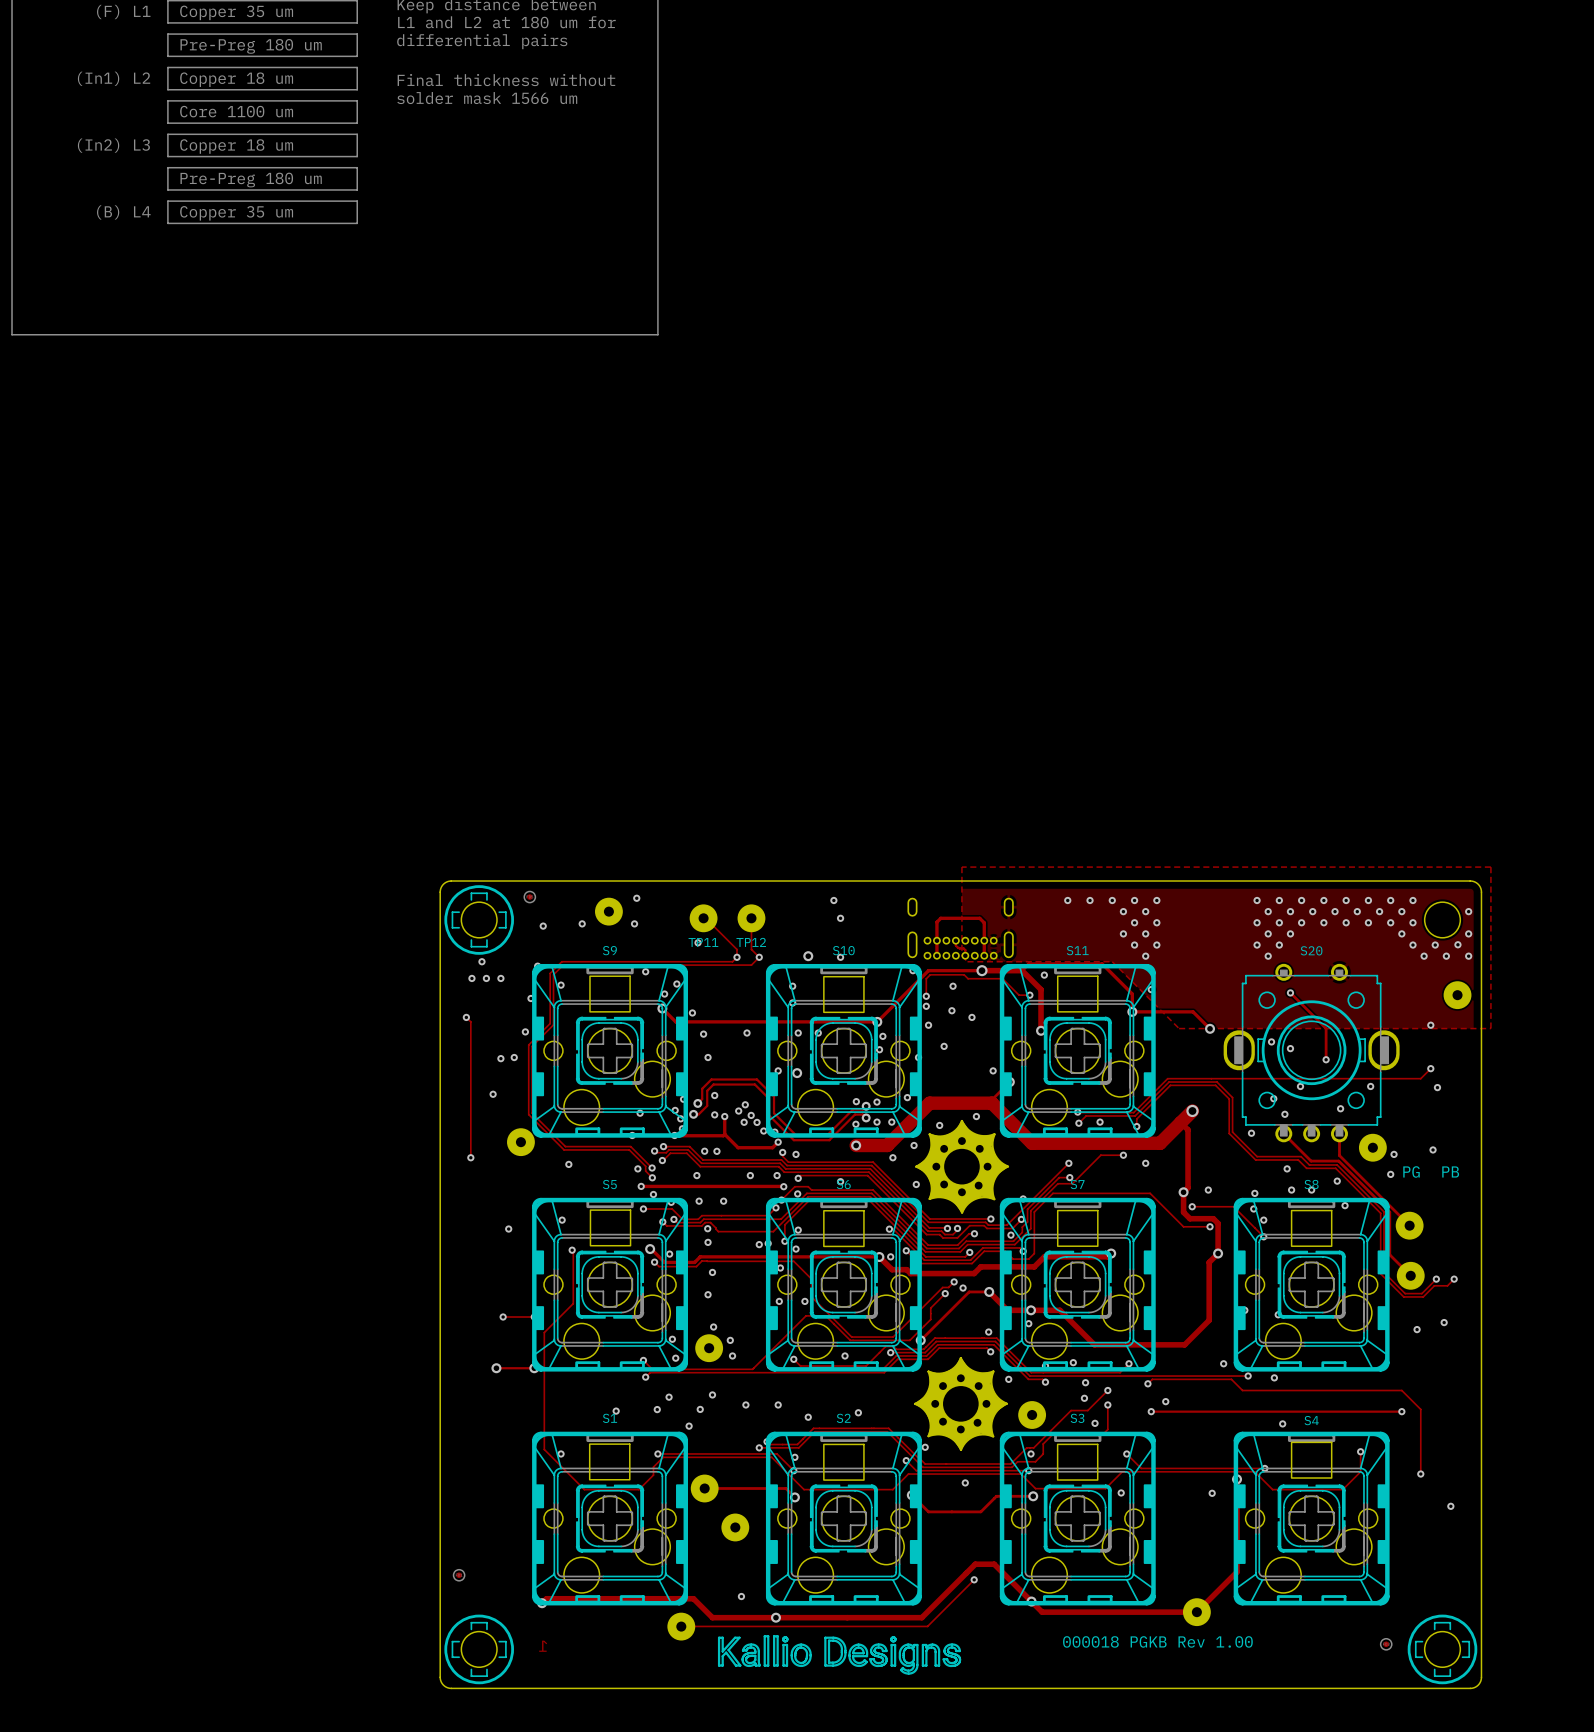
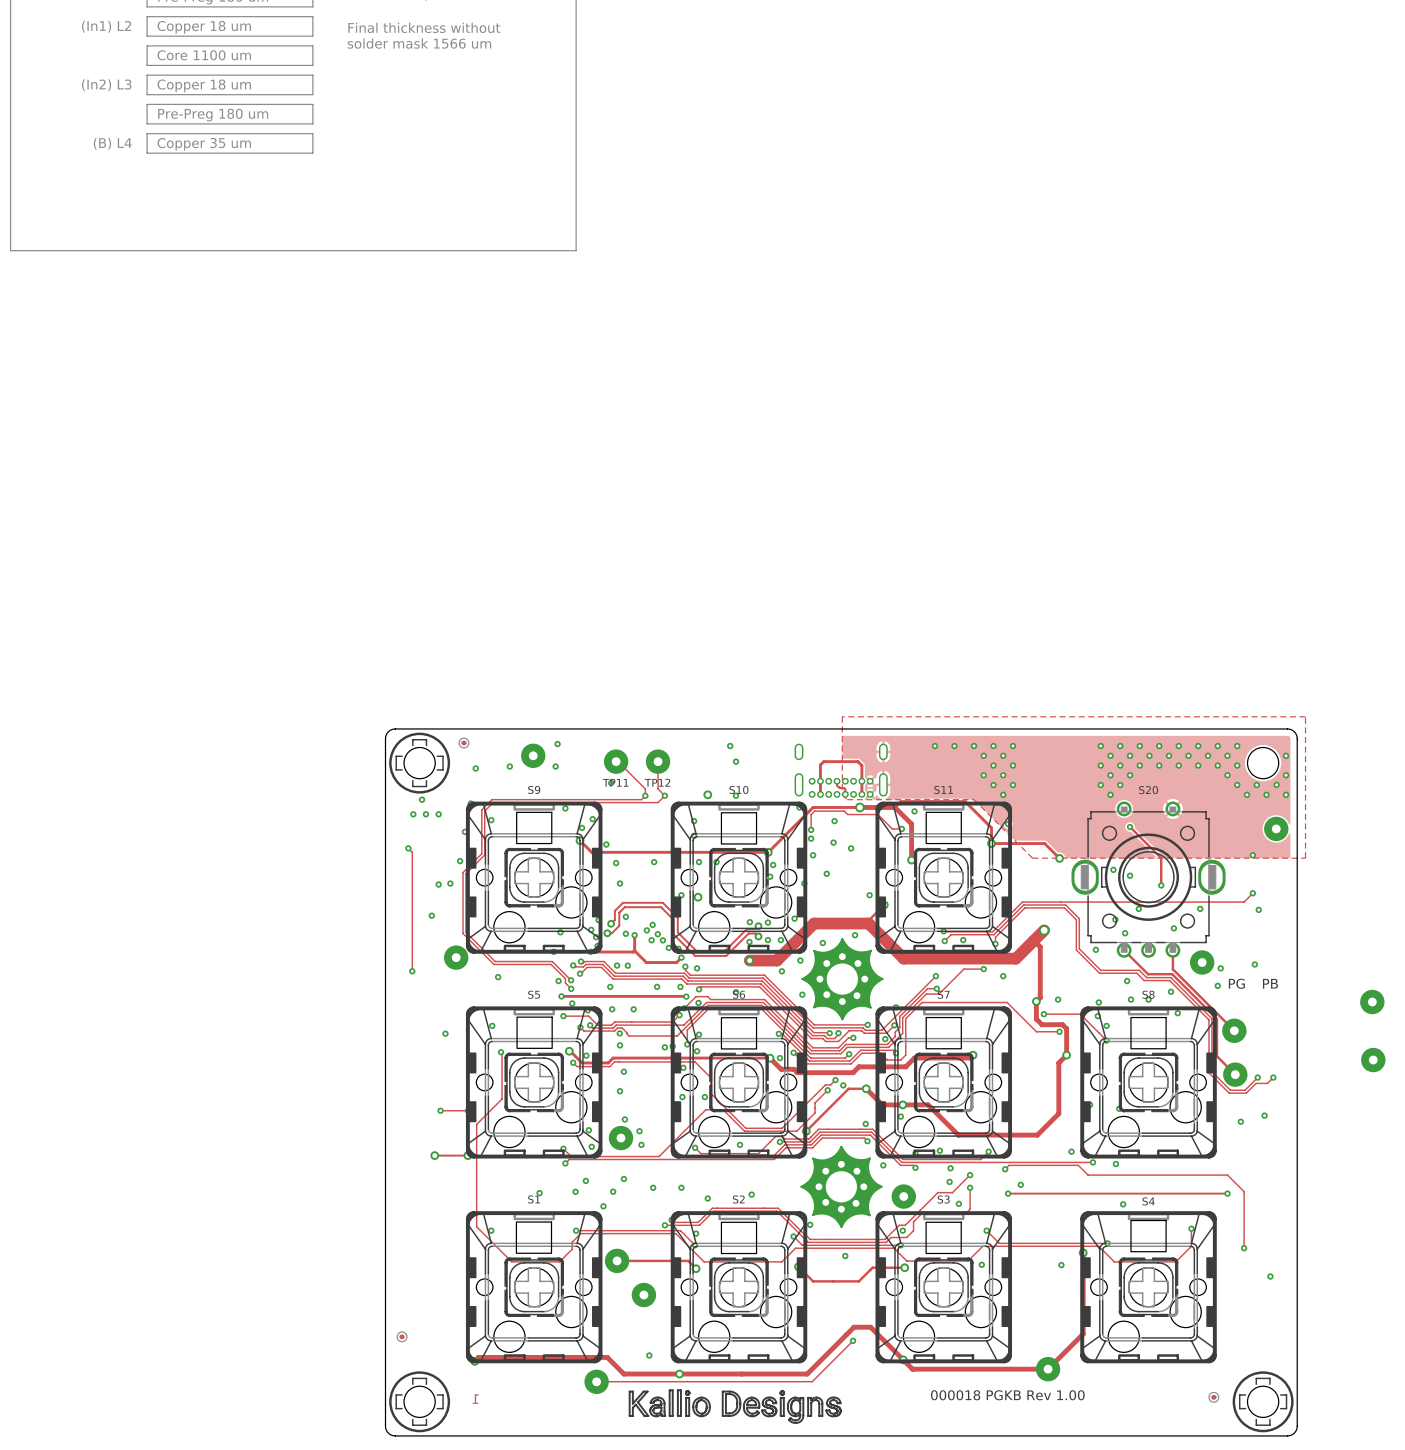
part: none -> (1372, 1002)
part: none -> (1373, 1060)

